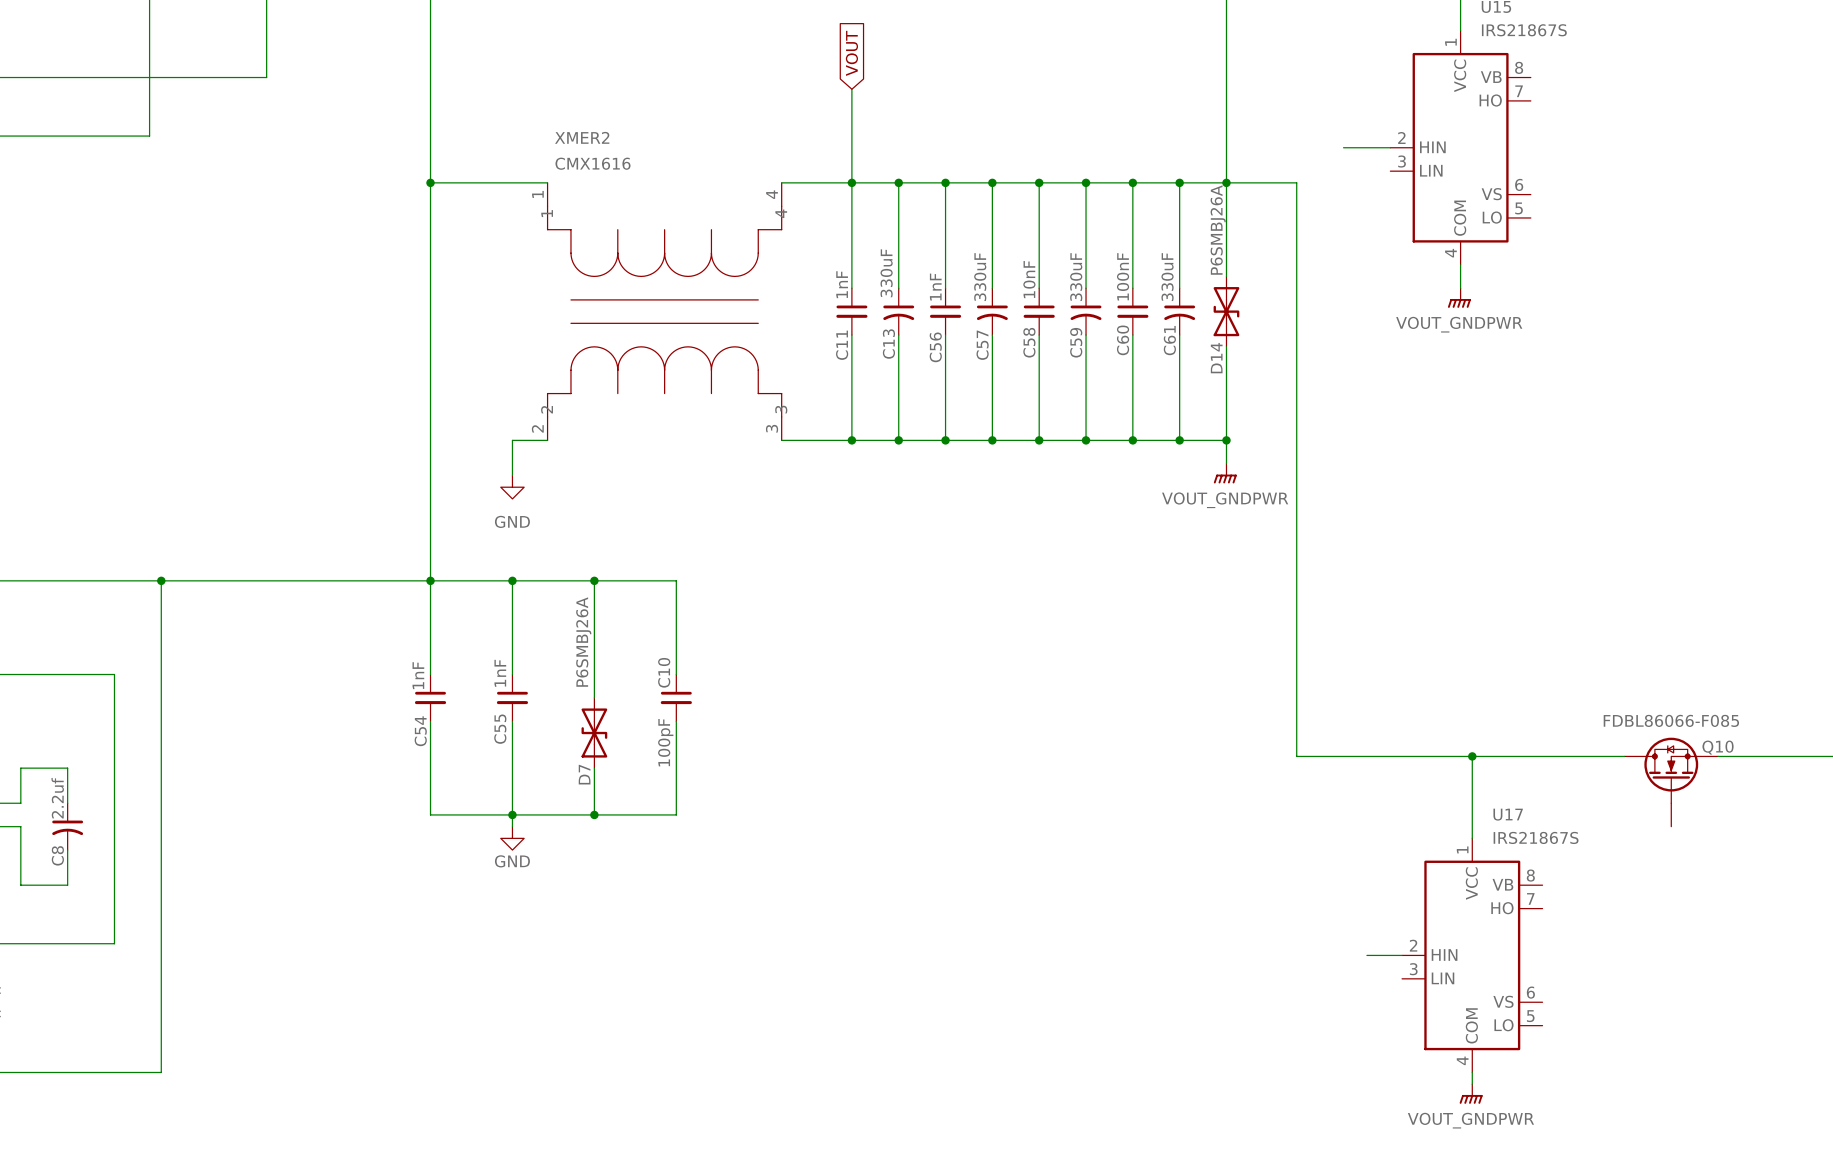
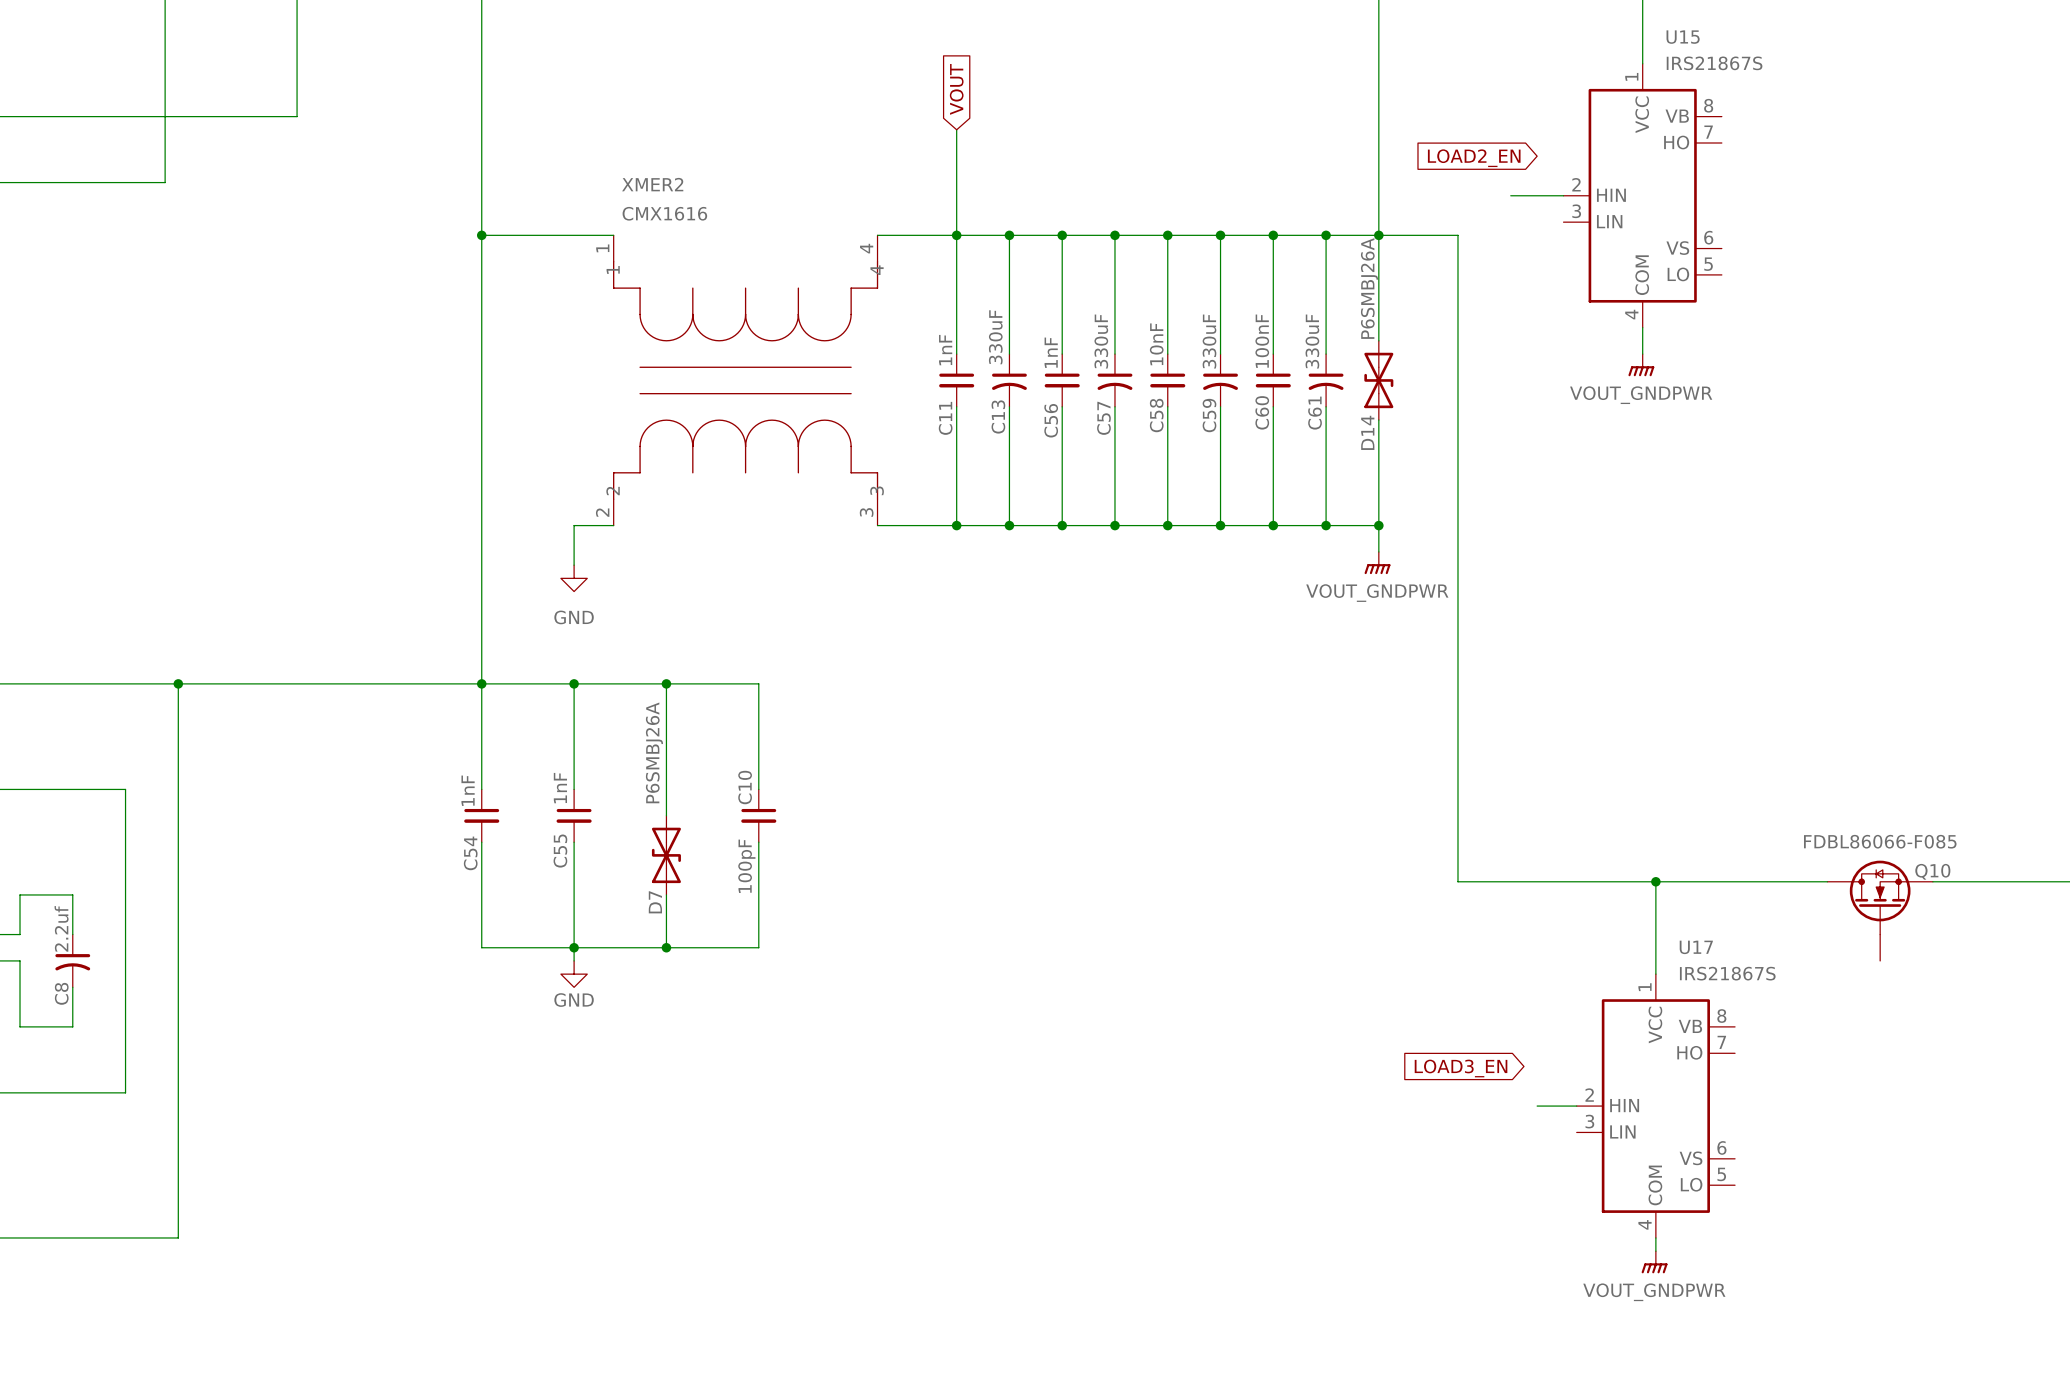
global label: none -> LOAD2_EN (1474, 158)
global label: none -> LOAD3_EN (1461, 1068)

